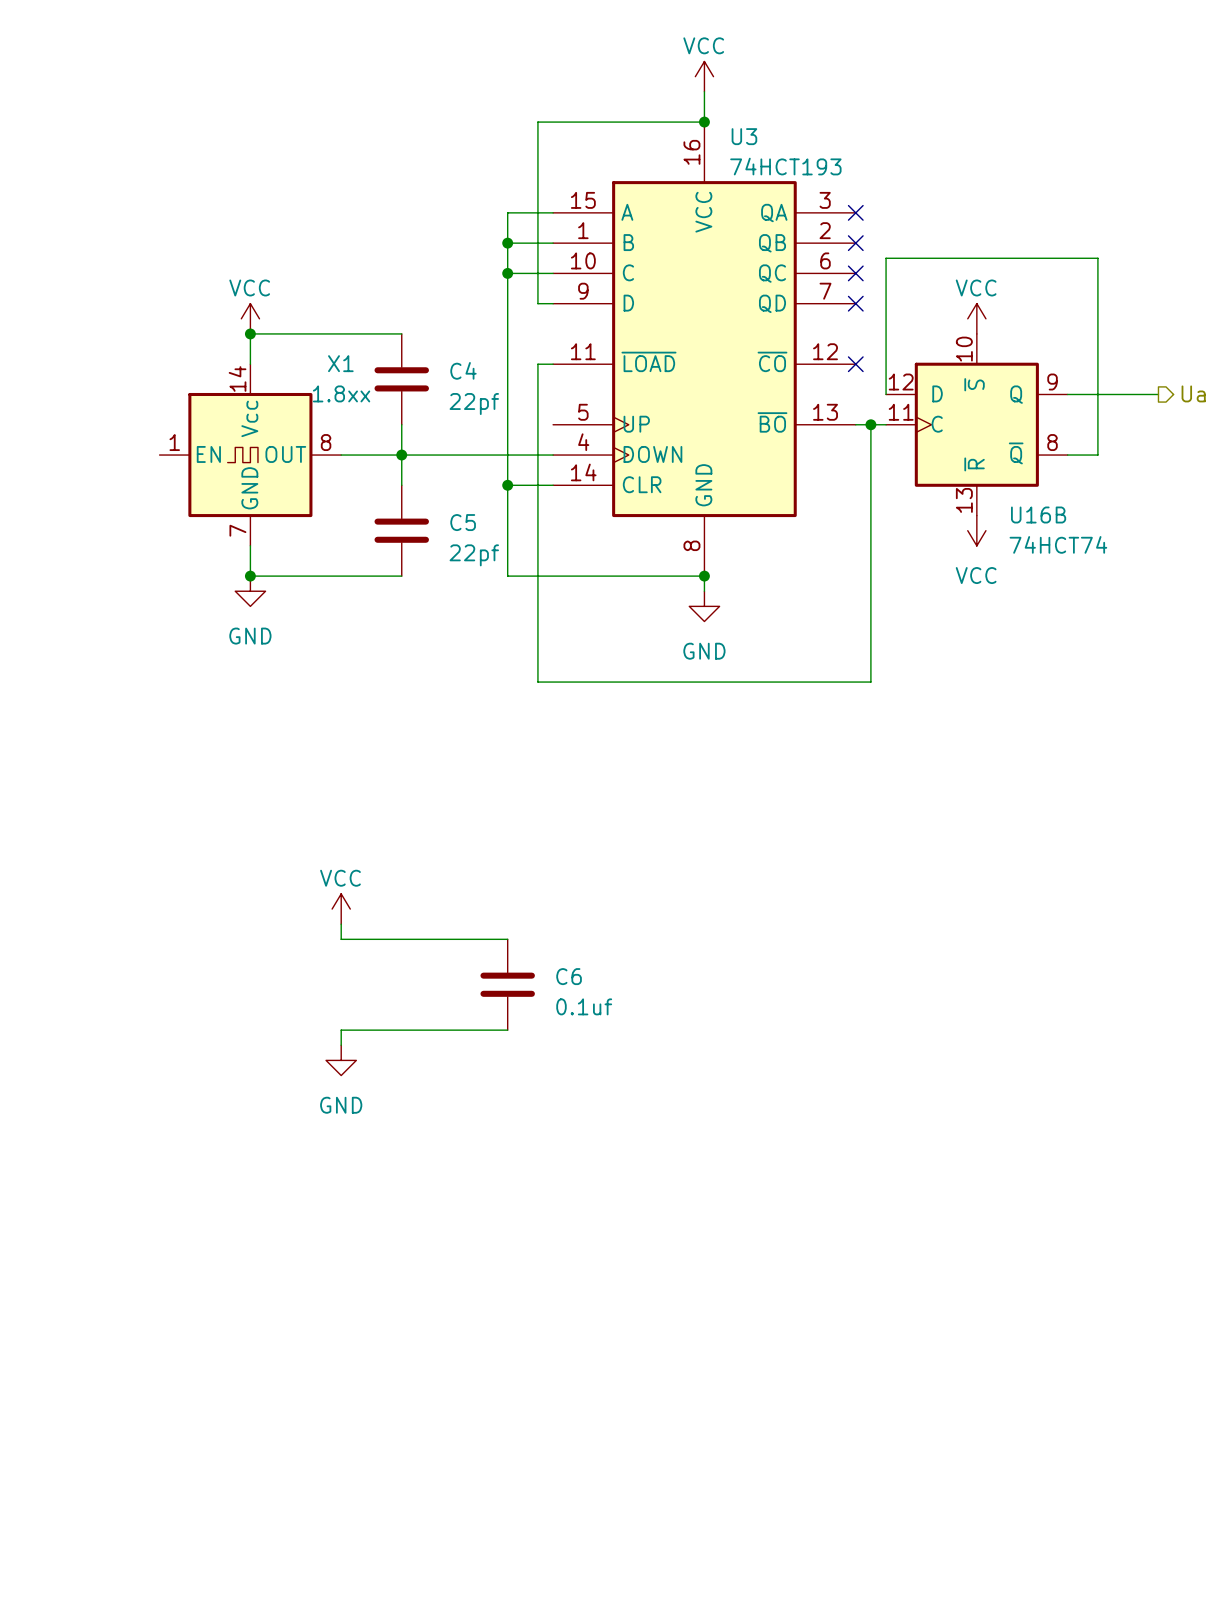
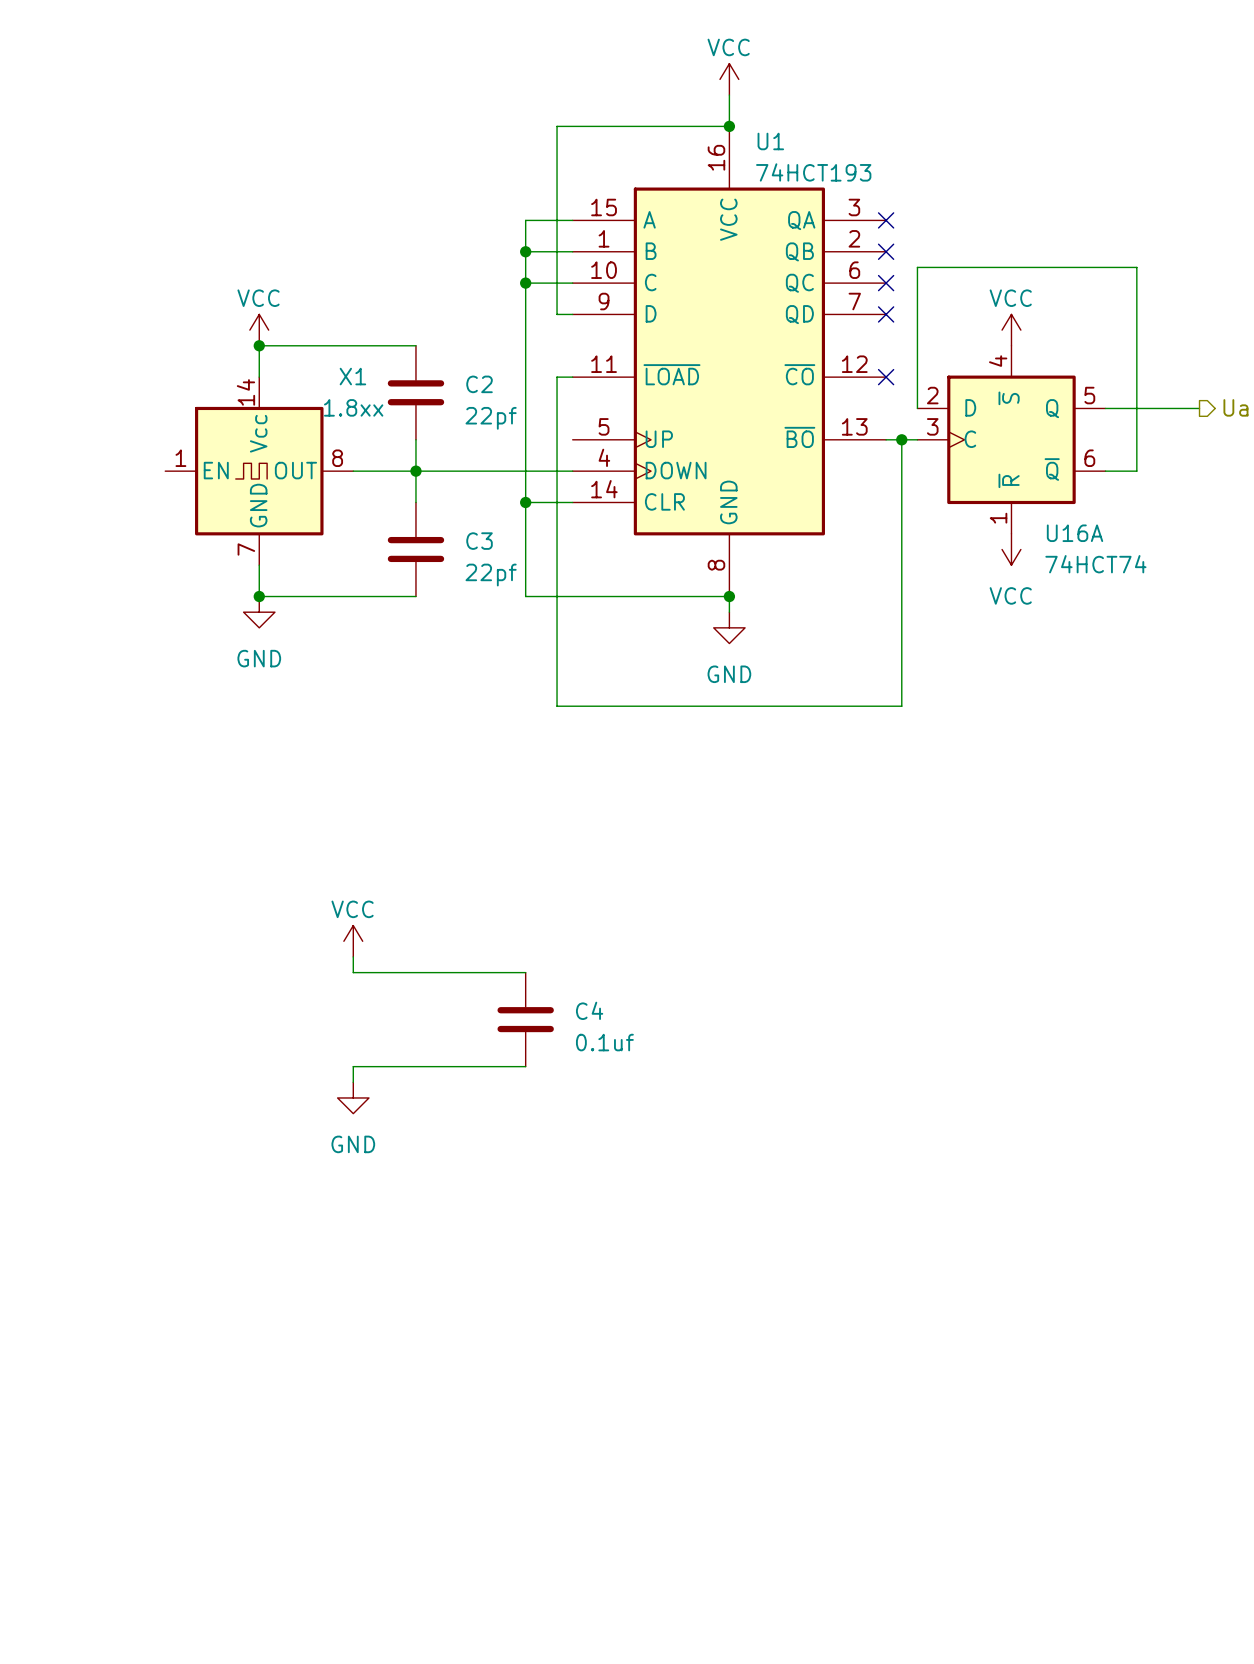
U3 name: U3 (744, 136) -> U1 (770, 141)
U16B pin number: 10 (964, 349) -> 4 (998, 361)
C4 name: C4 (463, 370) -> C2 (479, 384)
U16B pin number: 12 (901, 382) -> 2 (932, 395)
U16B pin number: 9 (1052, 382) -> 5 (1089, 395)
U16B pin number: 11 (901, 412) -> 3 (932, 426)
U16B pin number: 8 (1052, 442) -> 6 (1089, 458)
U16B pin number: 13 (964, 500) -> 1 (998, 518)
U16B name: U16B (1038, 515) -> U16A (1075, 533)
C5 name: C5 (463, 522) -> C3 (479, 541)
C6 name: C6 (569, 976) -> C4 (589, 1010)

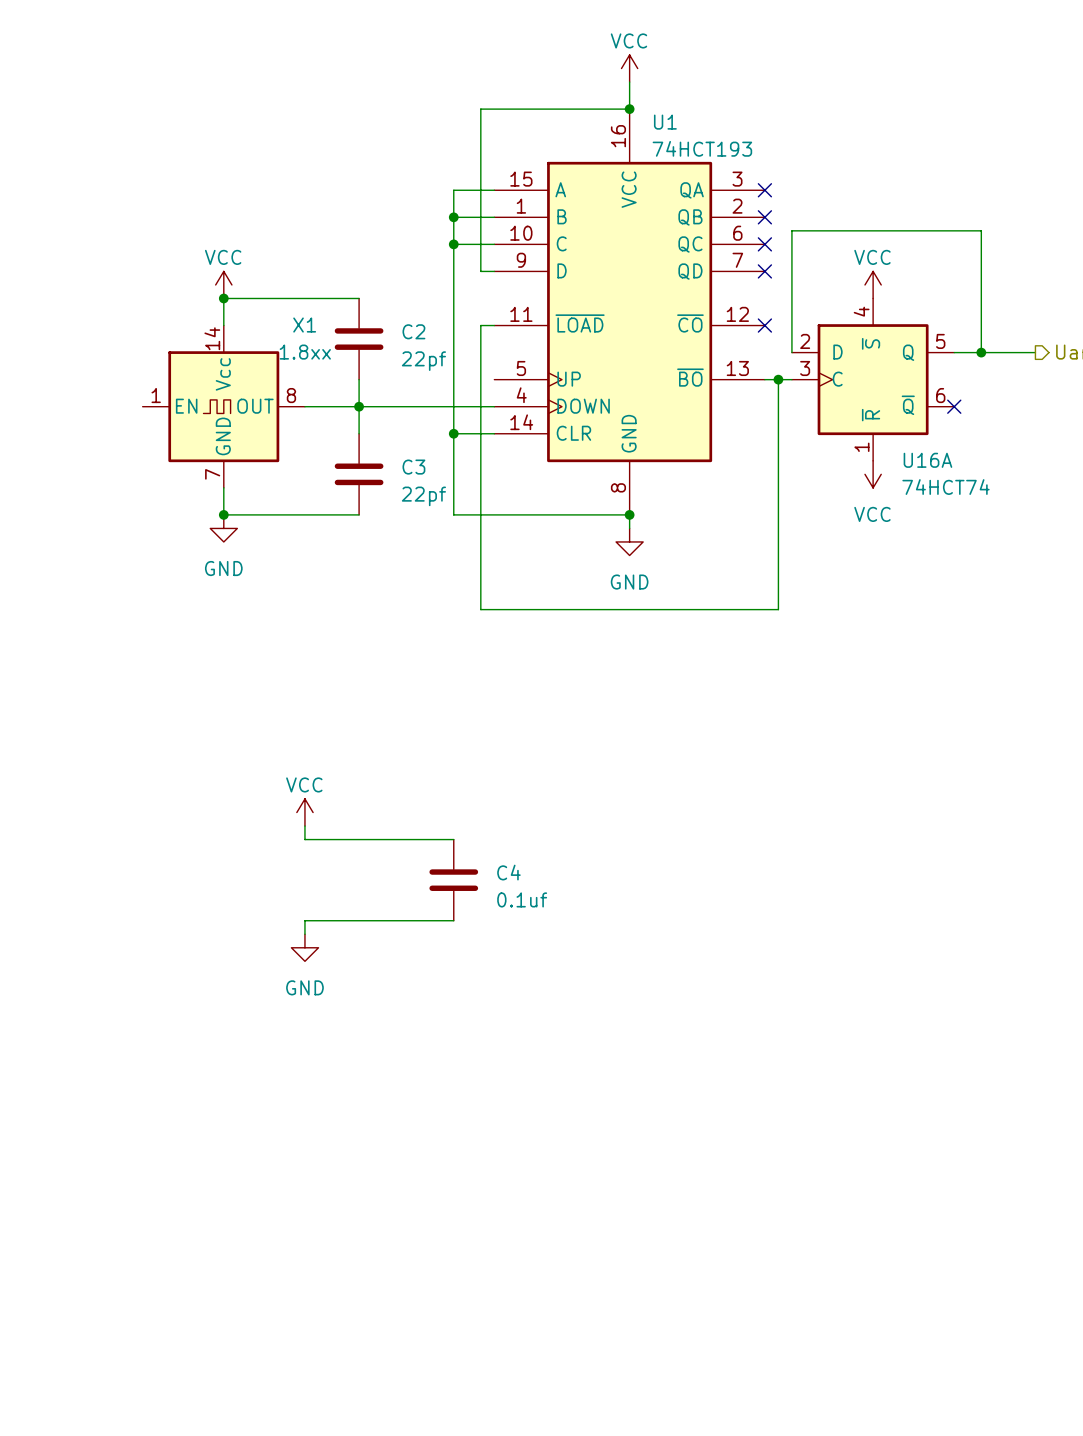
wire: (1136, 408) (1136, 471) (1105, 471) -> none
junction: none -> (981, 352)
no-connect mark: none -> (954, 406)

